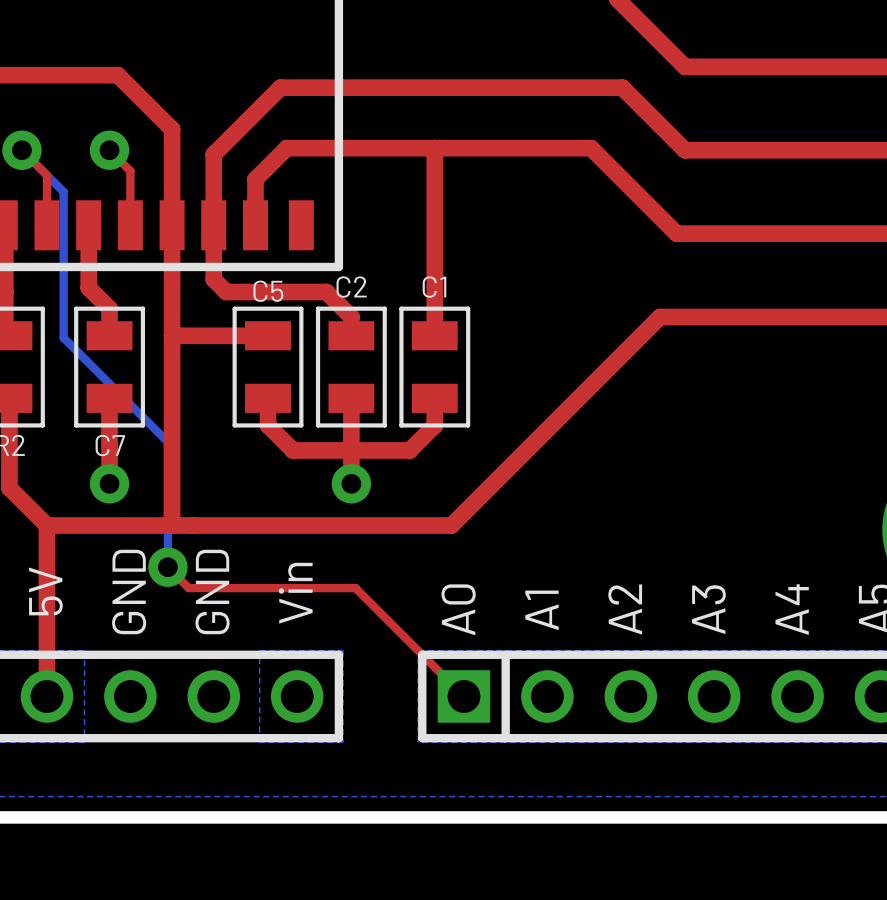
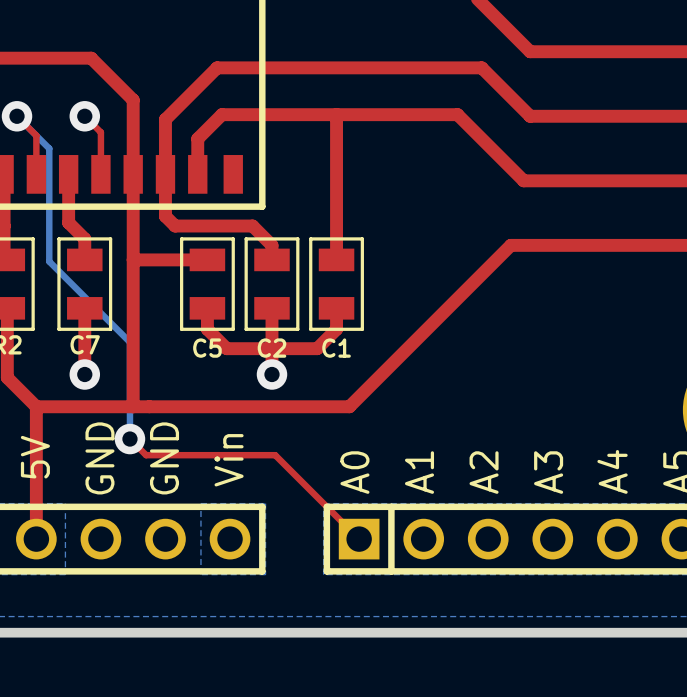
C2 name position: C2 (351, 287) -> C2 (271, 348)
C1 name position: C1 (434, 287) -> C1 (336, 348)
C5 name position: C5 (268, 291) -> C5 (207, 348)

